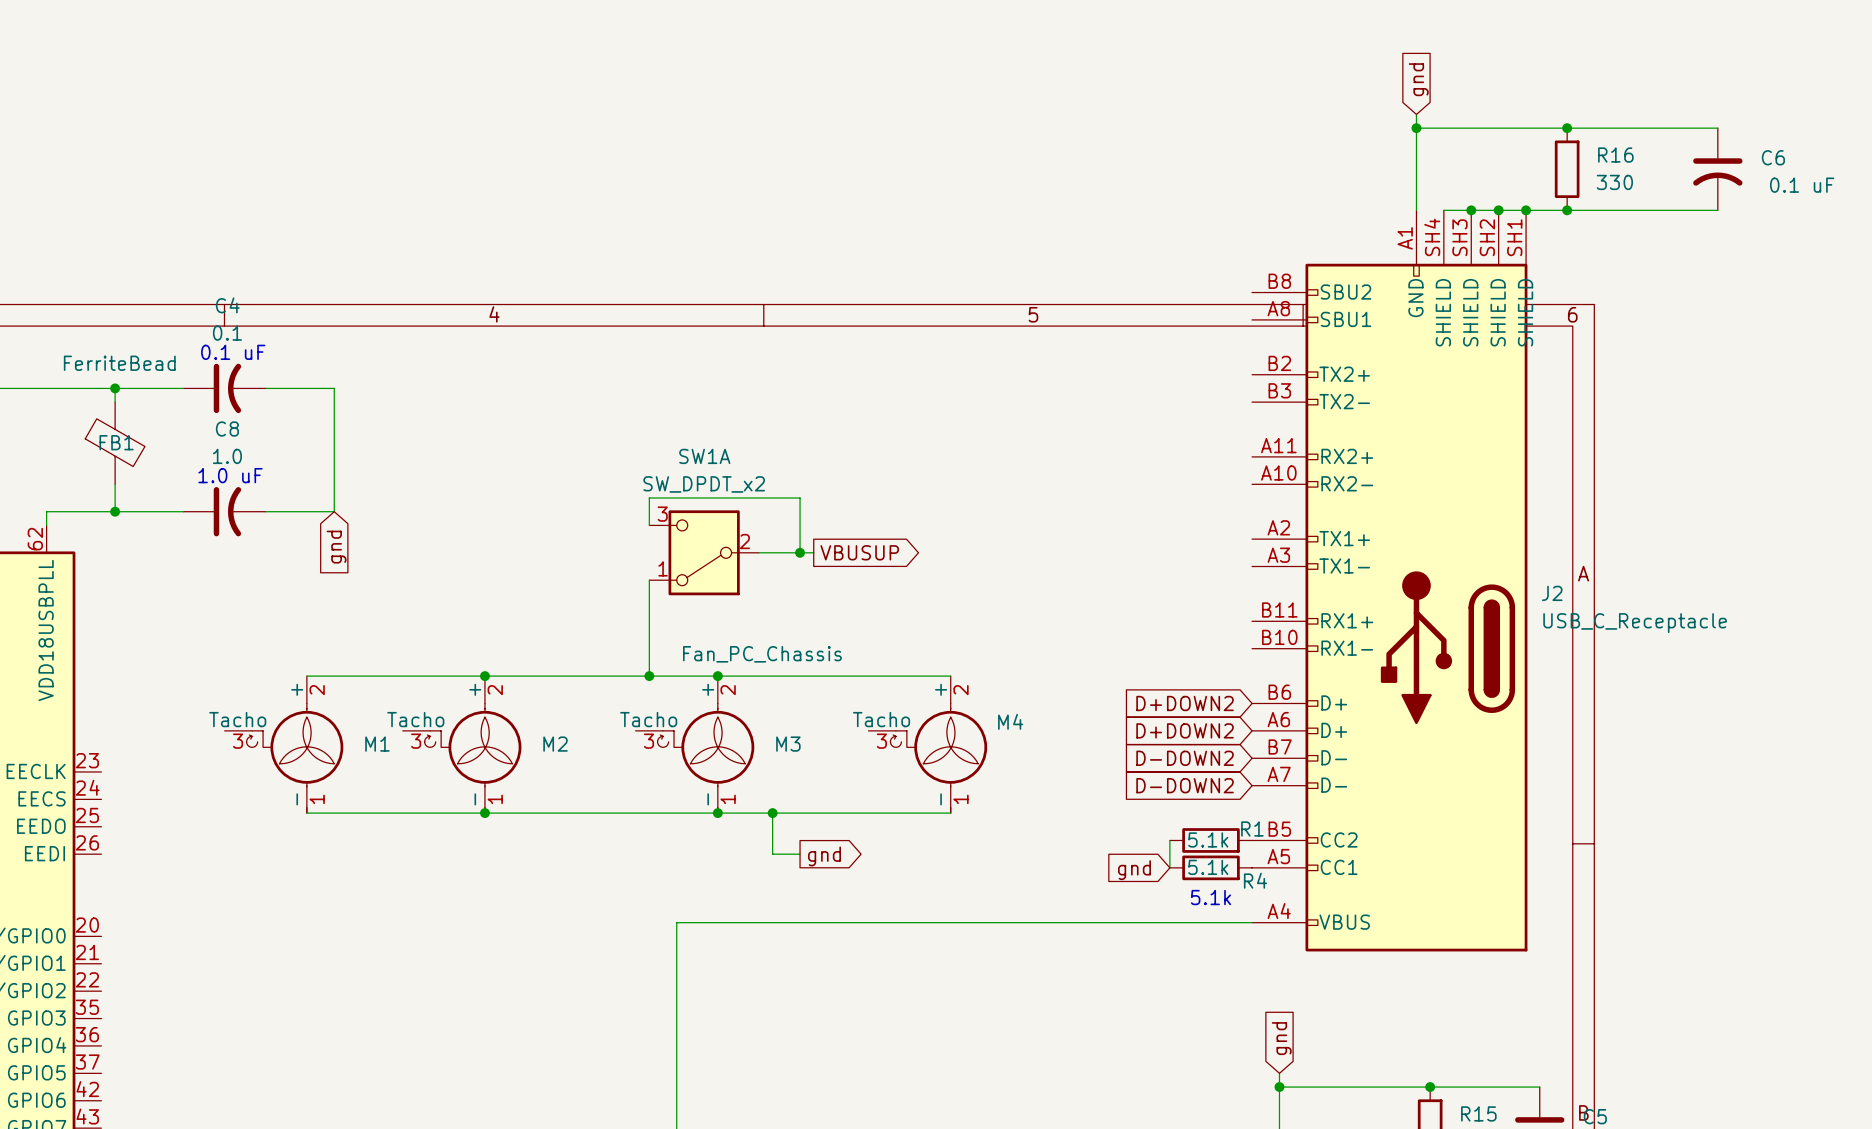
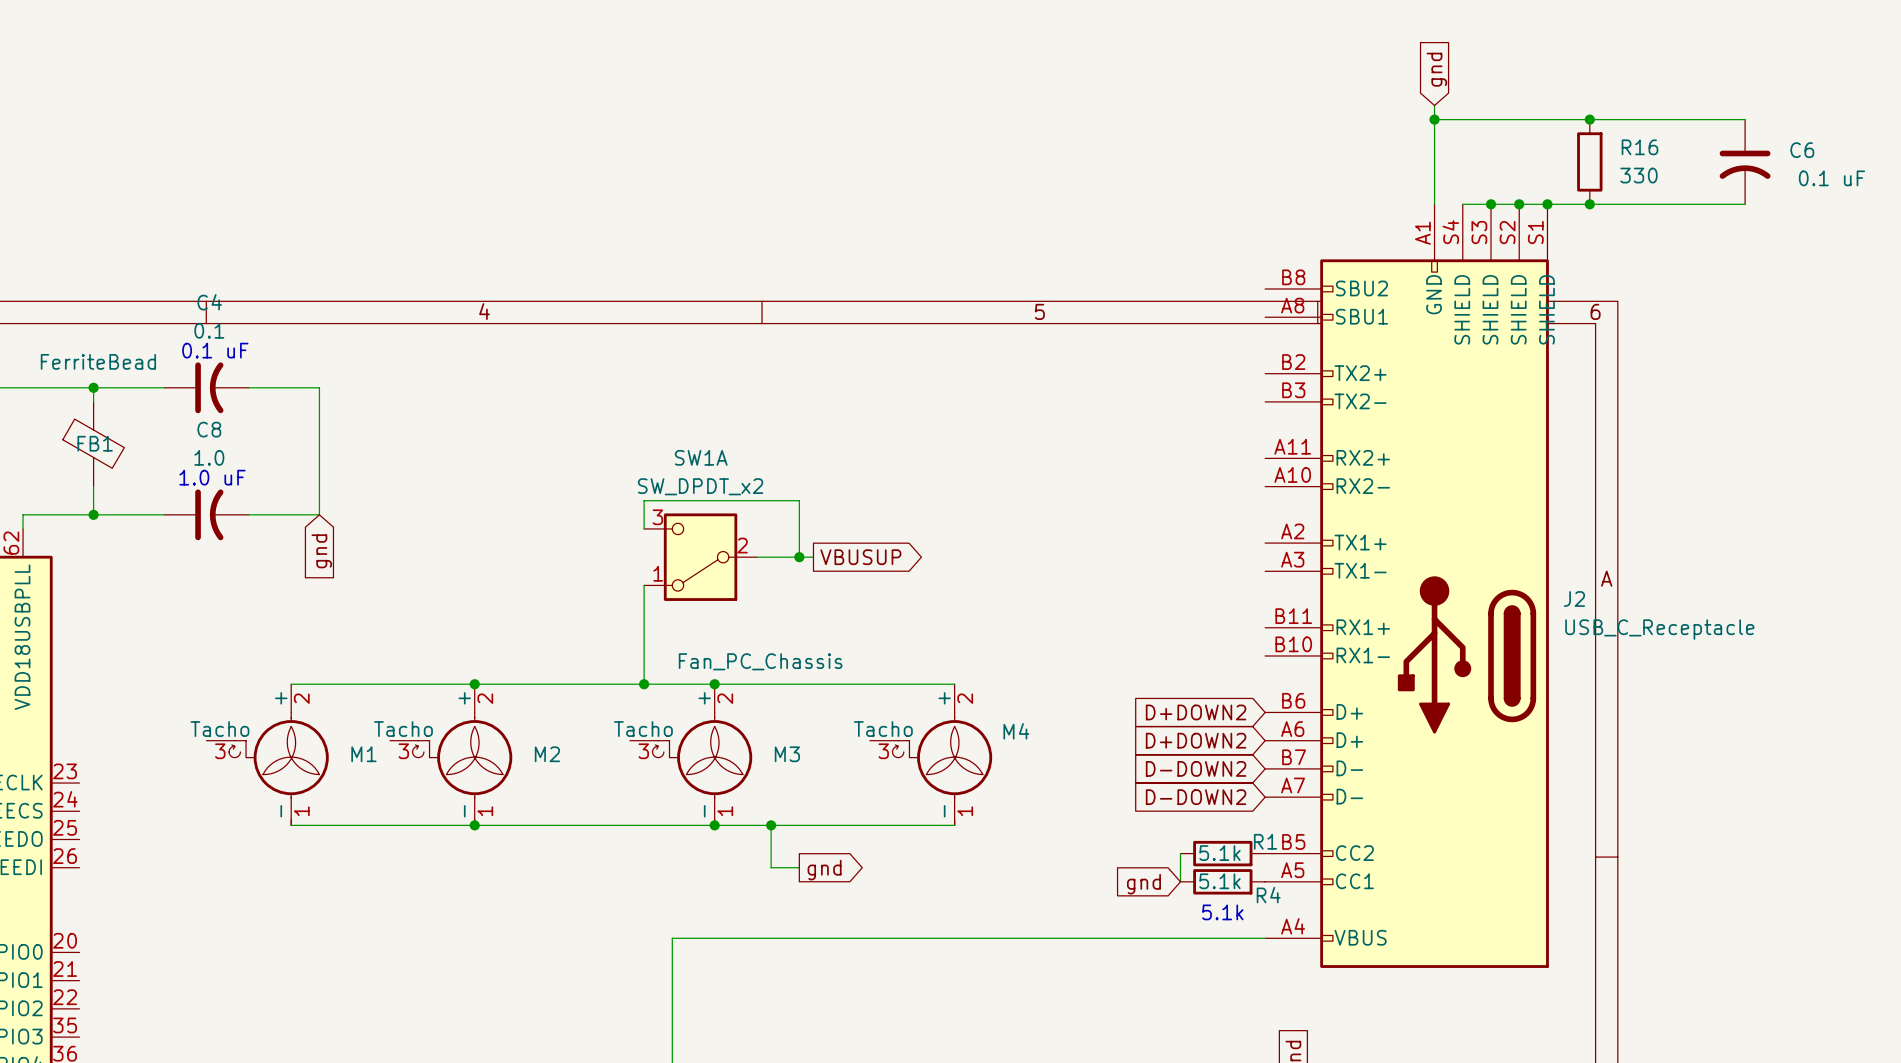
J2 pin number: SH4 (1432, 237) -> S4 (1450, 232)
J2 pin number: SH3 (1459, 237) -> S3 (1479, 232)
J2 pin number: SH2 (1487, 237) -> S2 (1507, 232)
J2 pin number: SH1 (1514, 237) -> S1 (1535, 232)

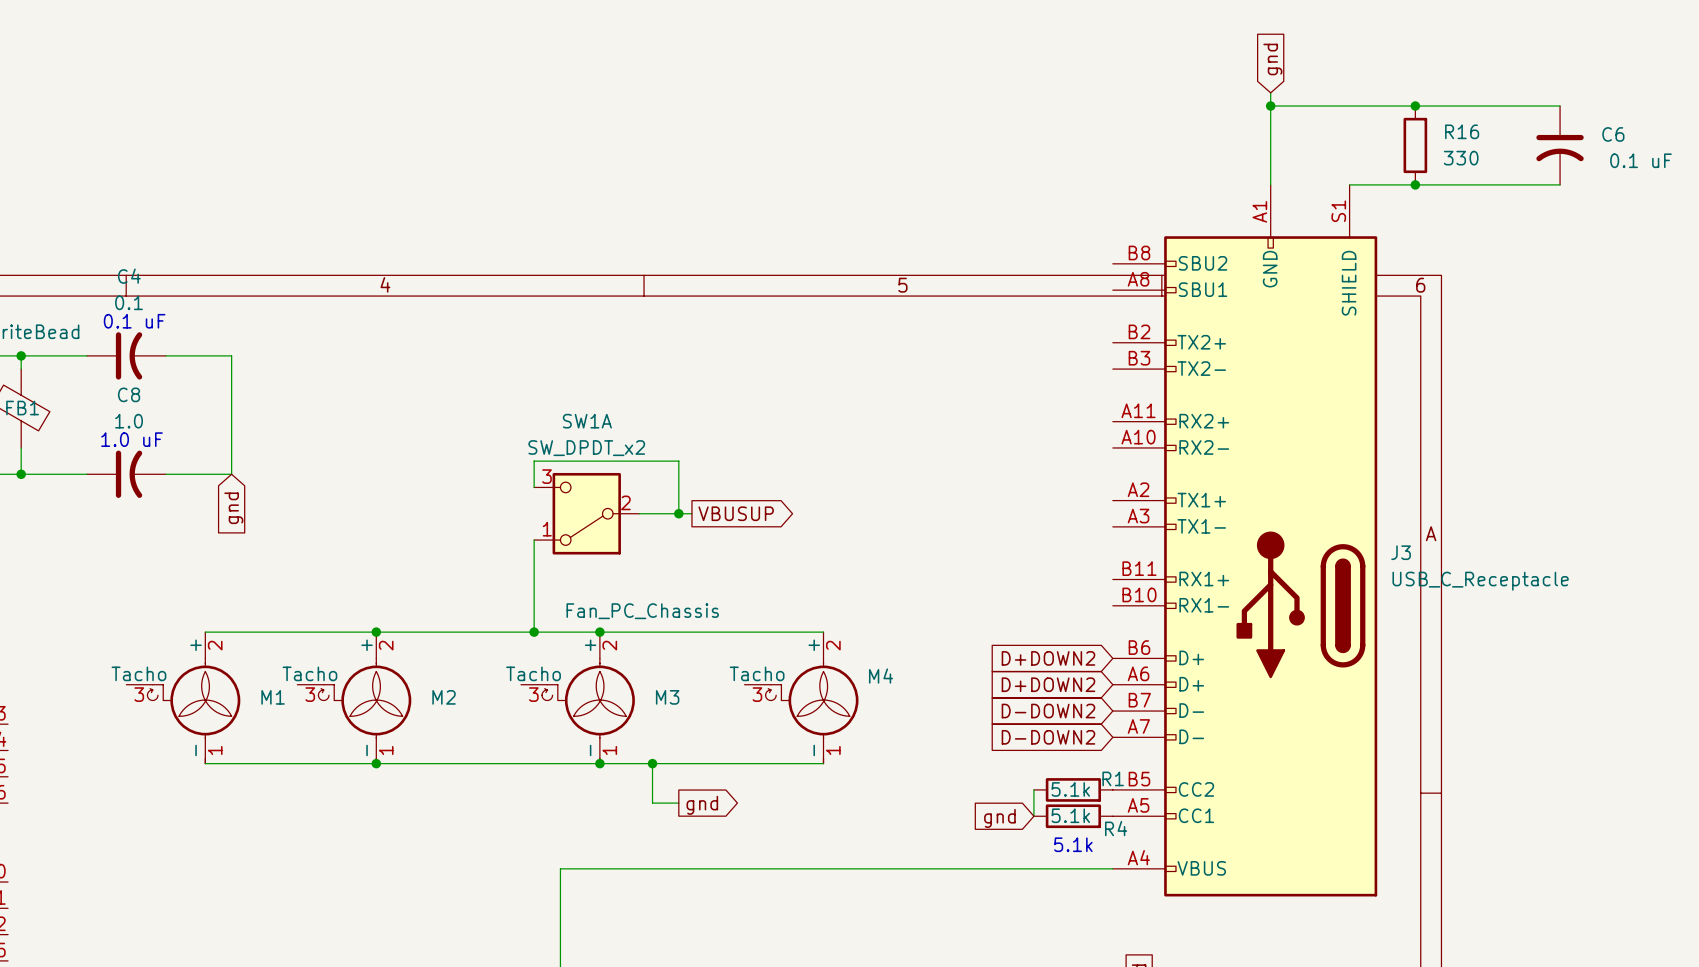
wire: (1462, 204) (1519, 204) -> none
junction: (1491, 204) -> none
junction: (1519, 204) -> none
junction: (1547, 204) -> none
J2: USB_C_Receptacle (1407, 586) -> none
J3: none -> USB_C_Receptacle (1245, 540)

